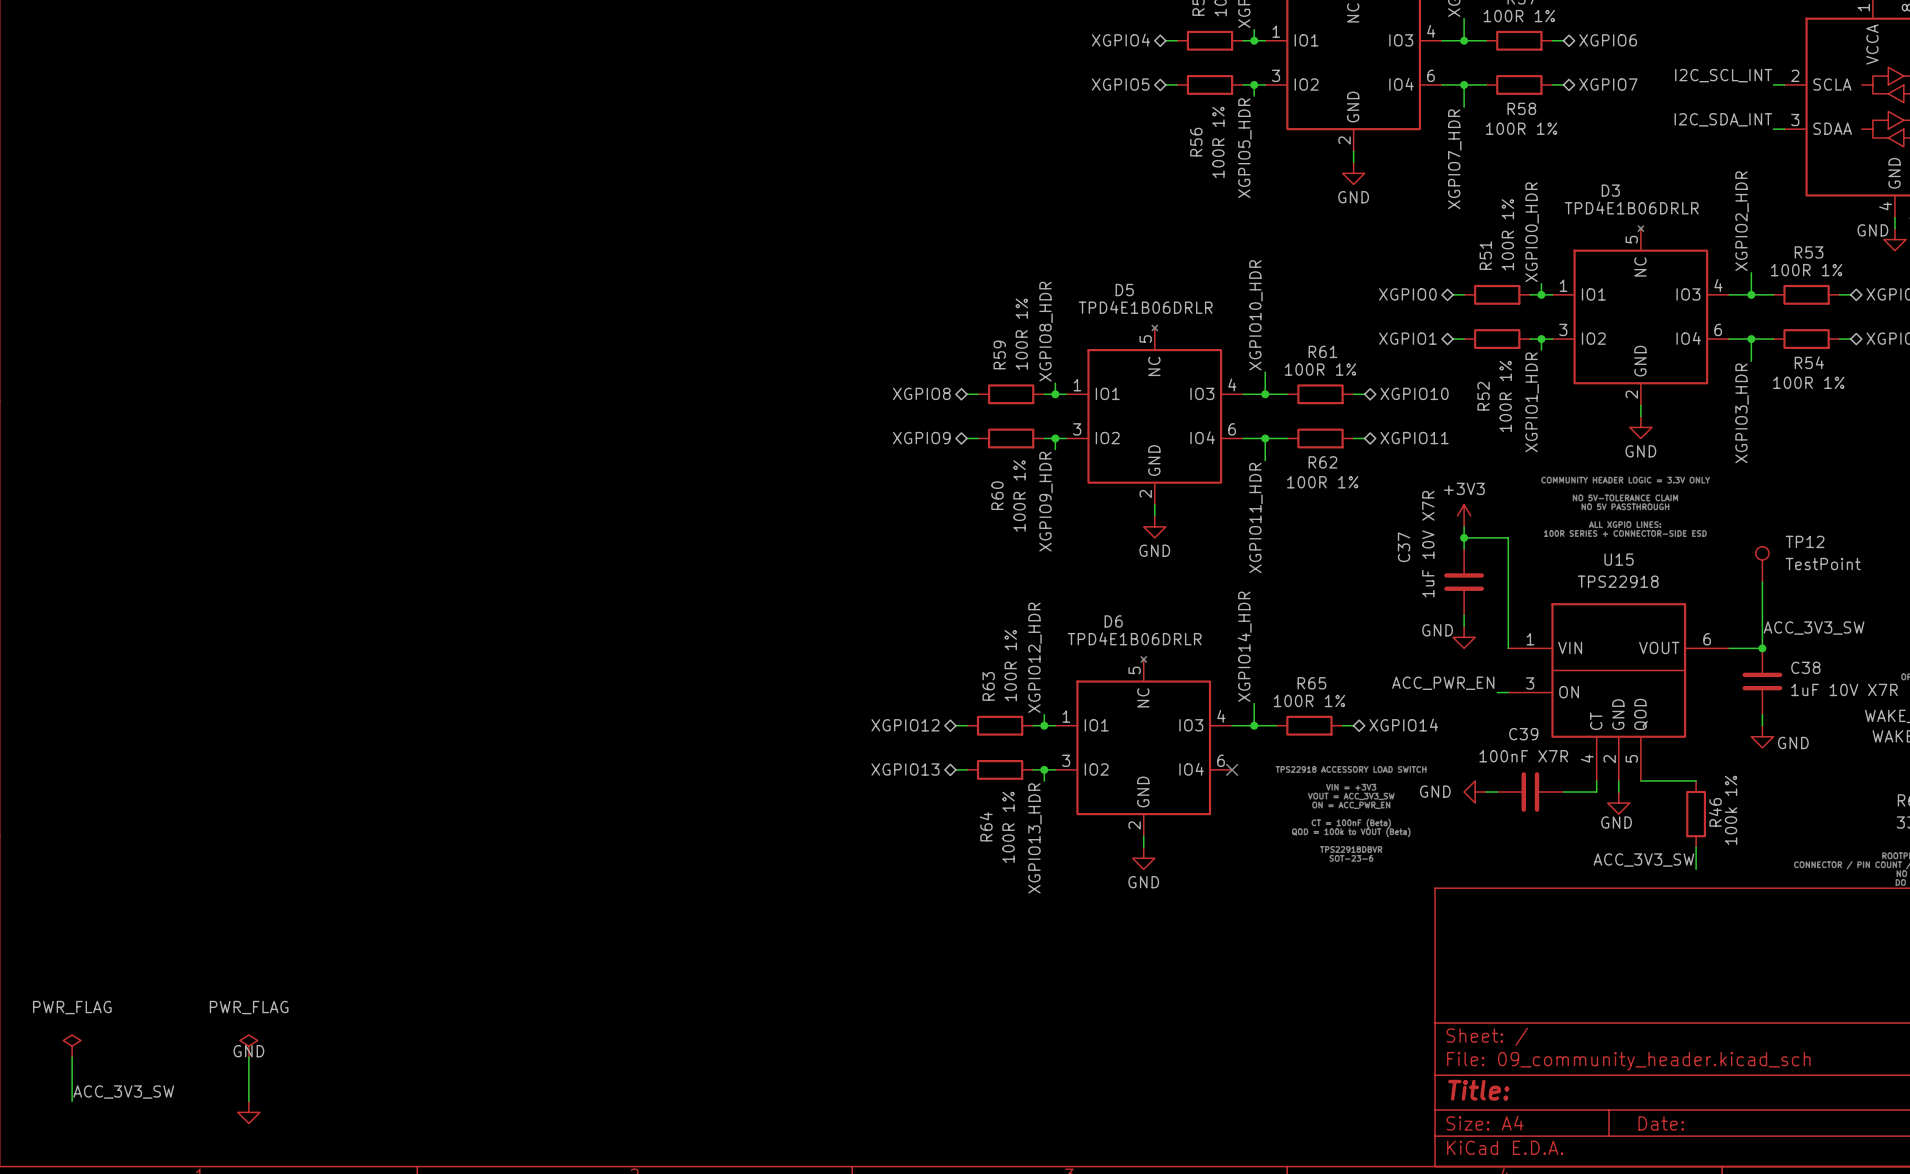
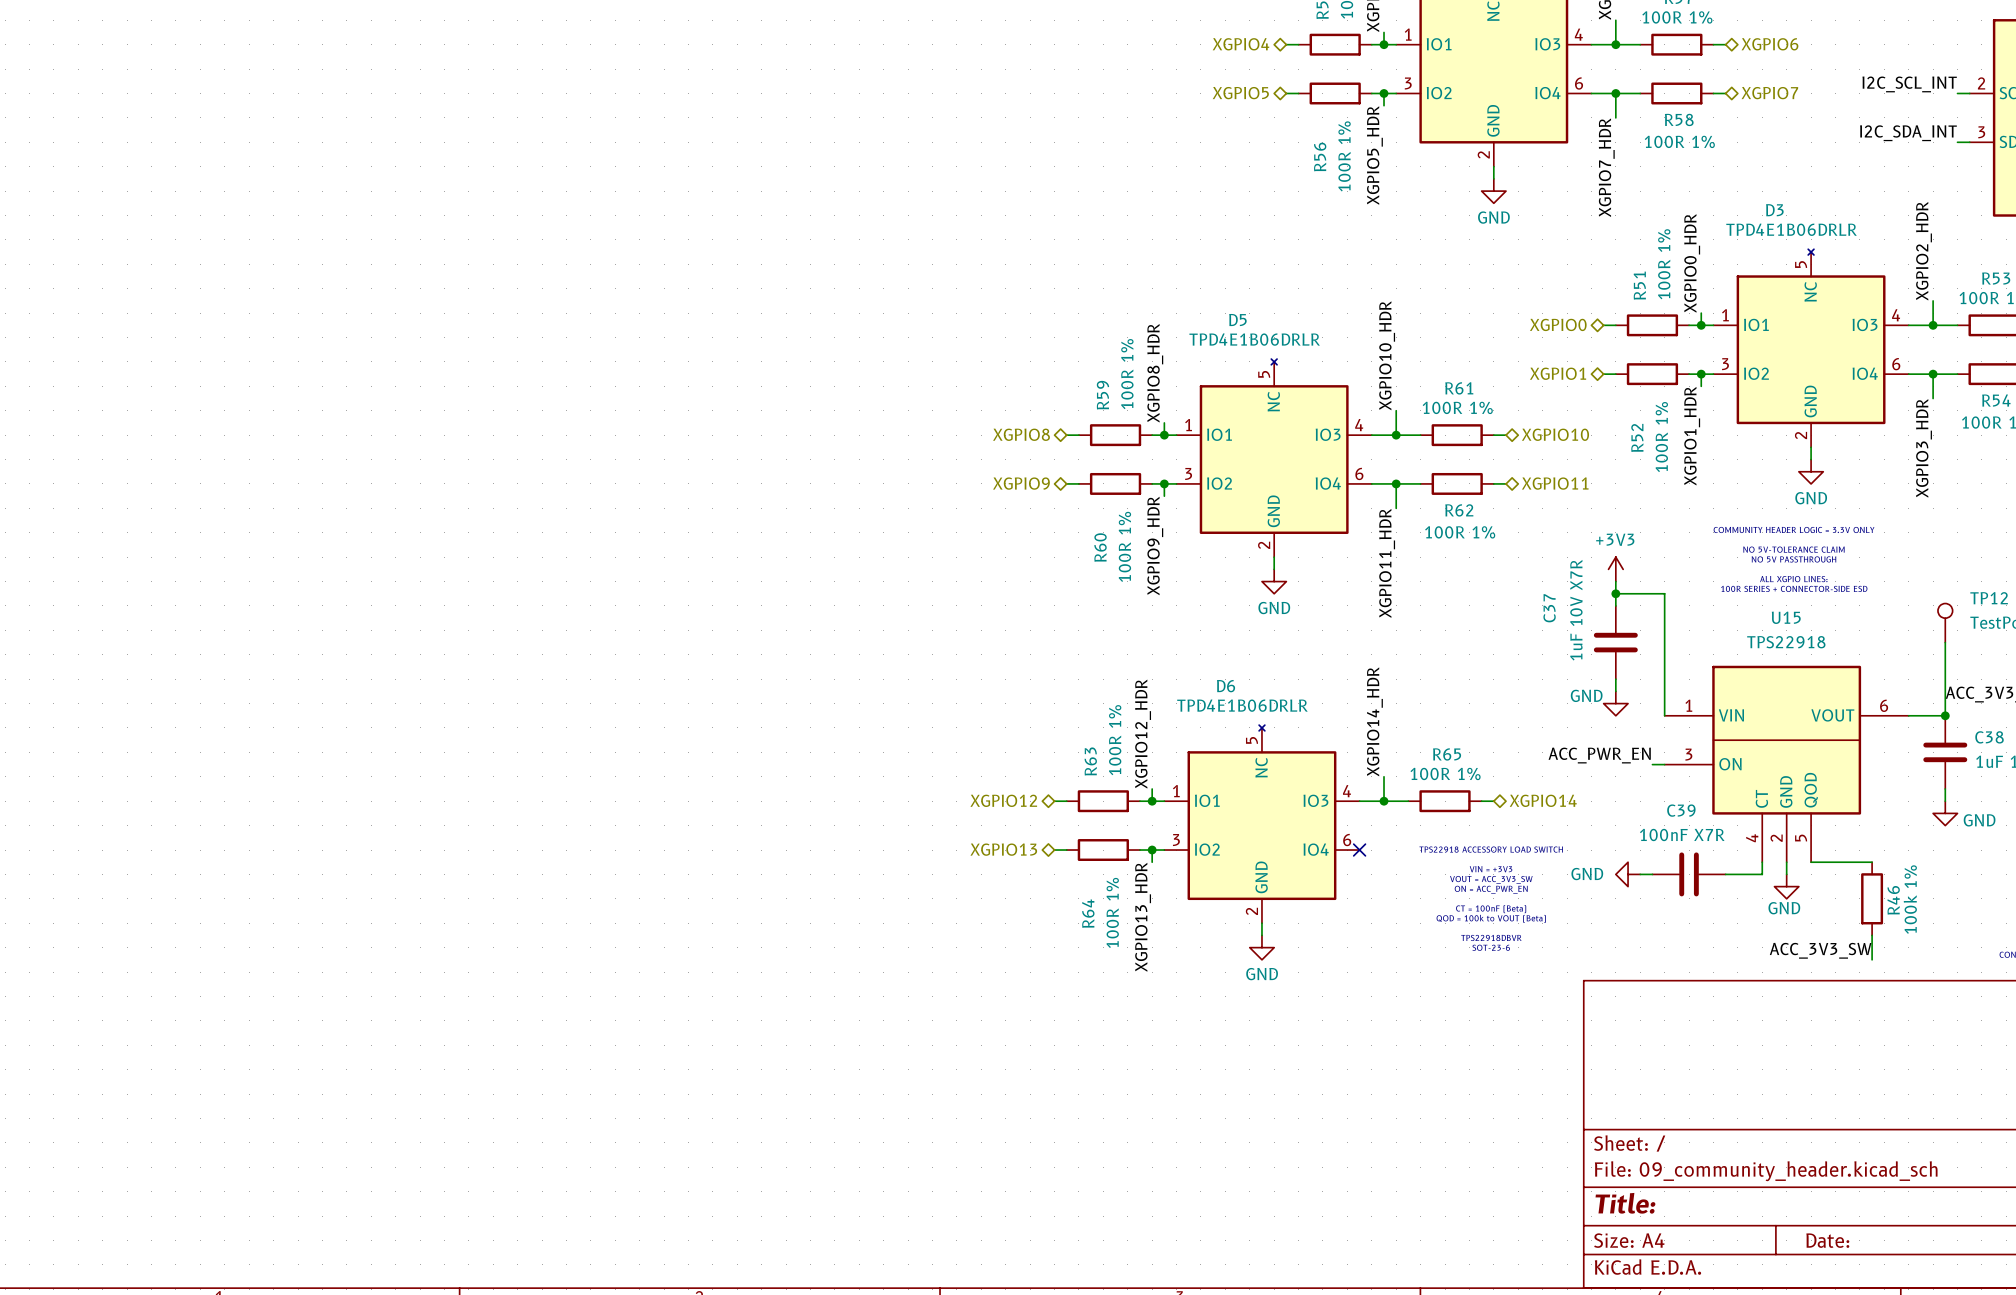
power symbol: PWR_FLAG (72, 1046) -> none
power symbol: PWR_FLAG (248, 1046) -> none
wire: (72, 1057) (72, 1101) -> none
wire: (248, 1057) (248, 1101) -> none
label: ACC_3V3_SW (123, 1092) -> none
power symbol: GND (248, 1112) -> none

